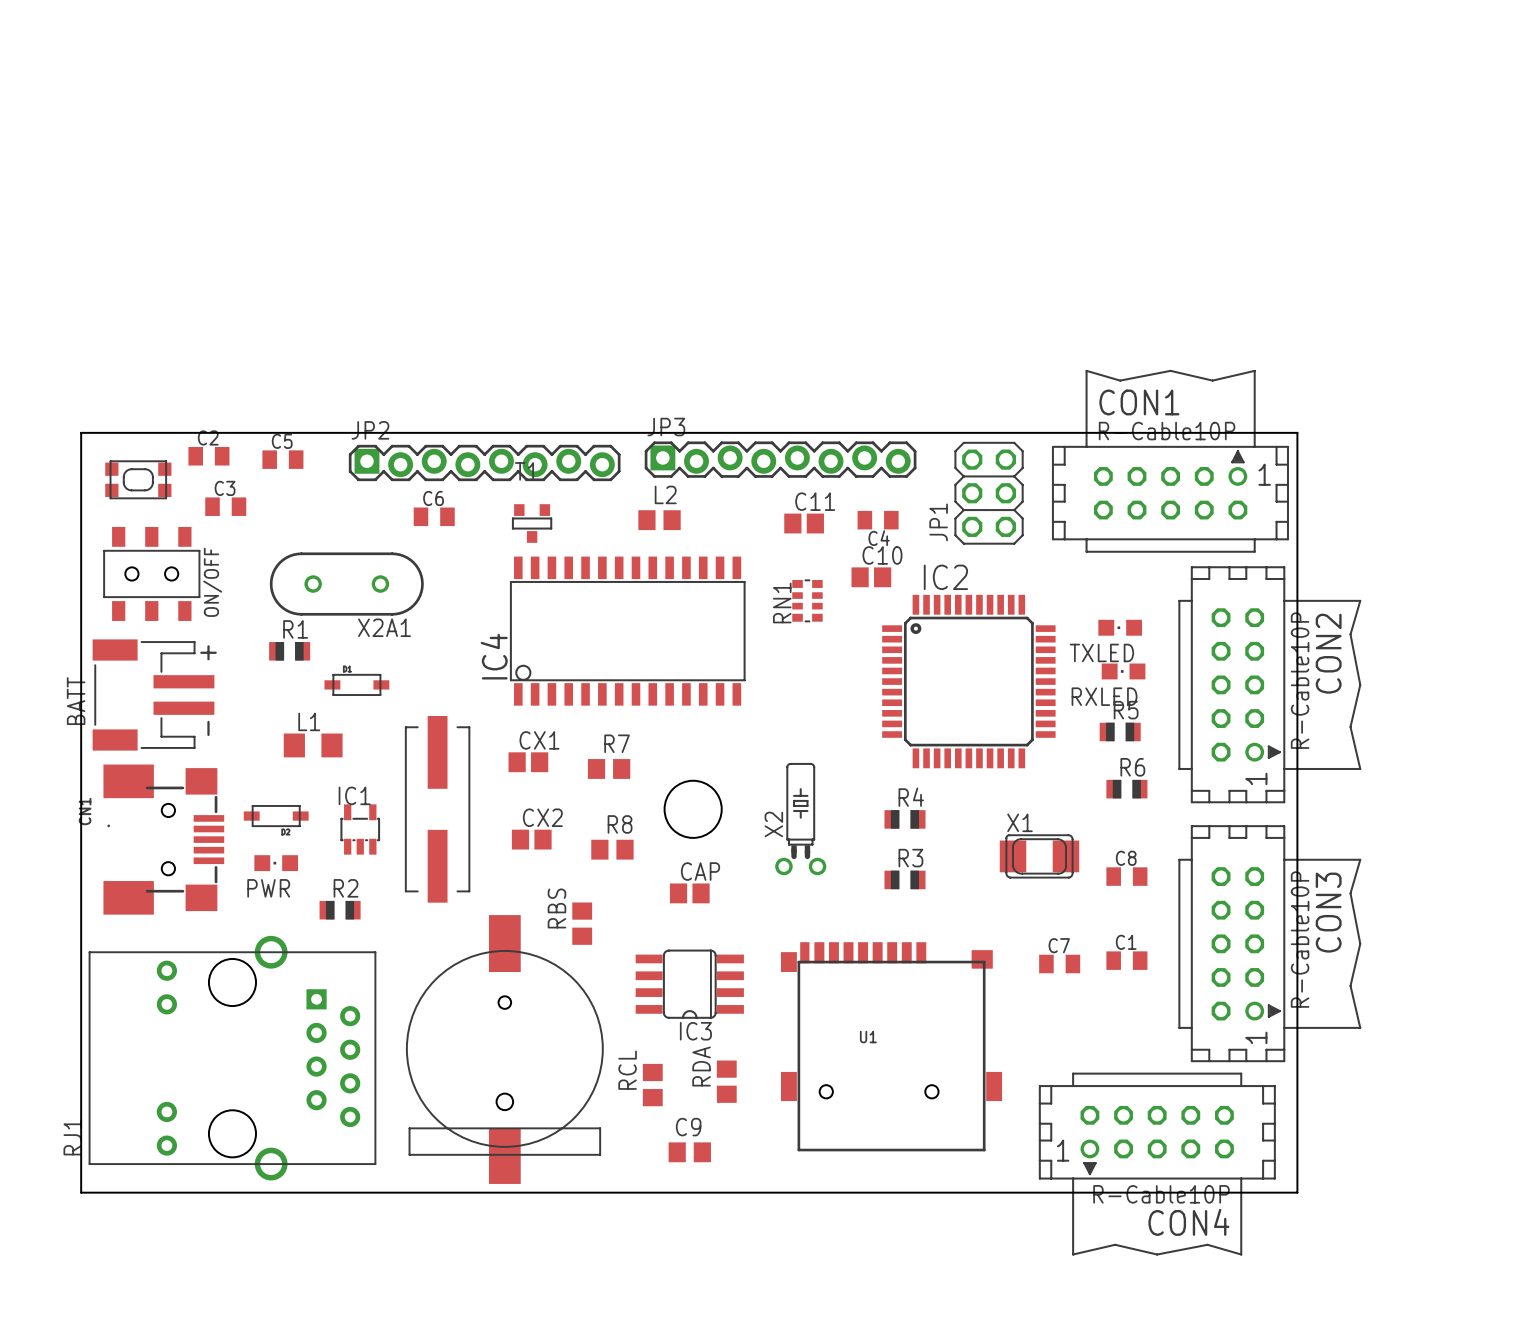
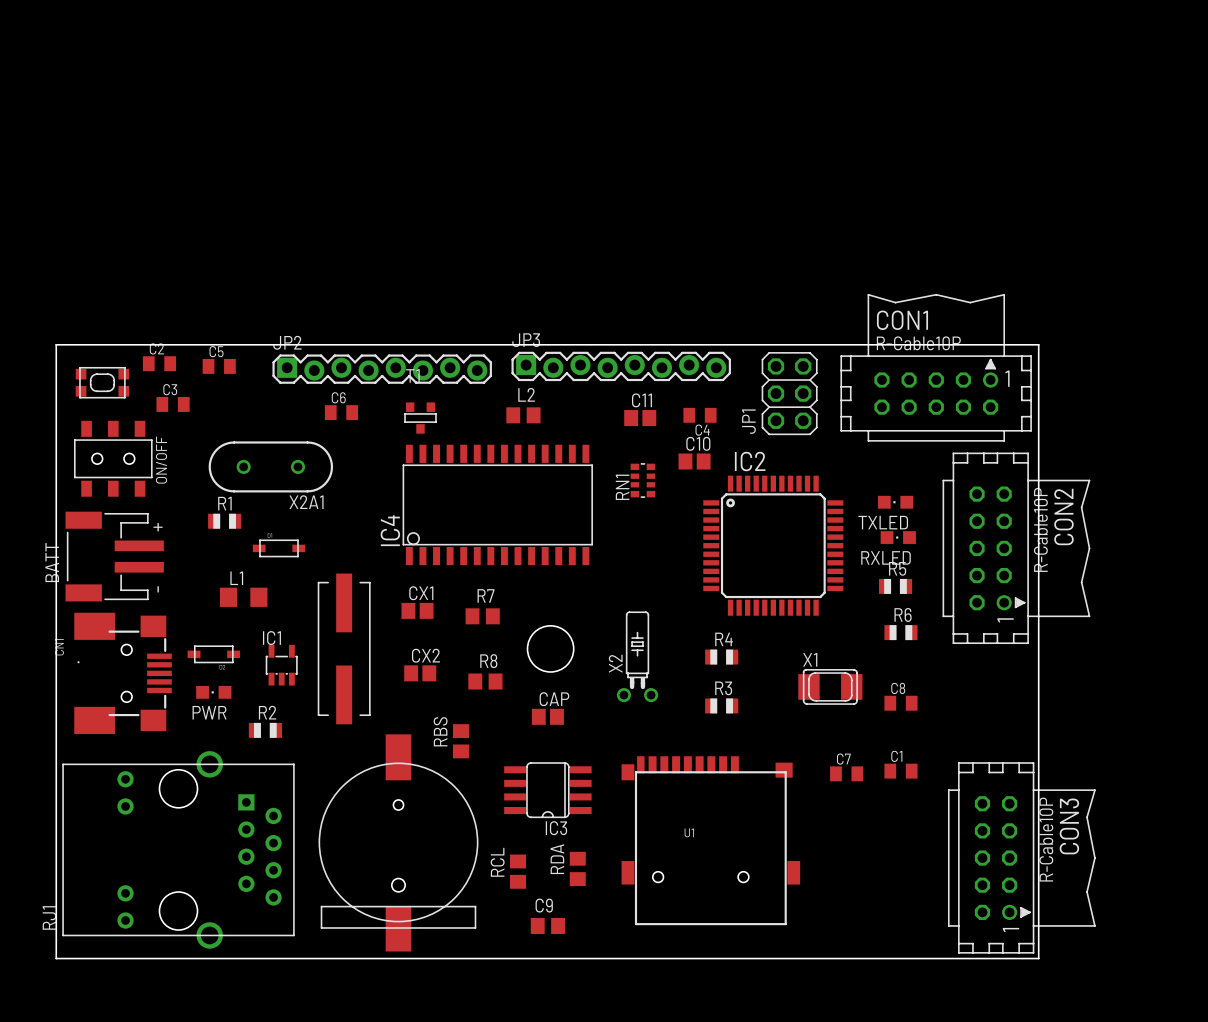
CON3 position: (1269, 943) -> (1021, 857)
CON4: (1157, 1164) -> none

